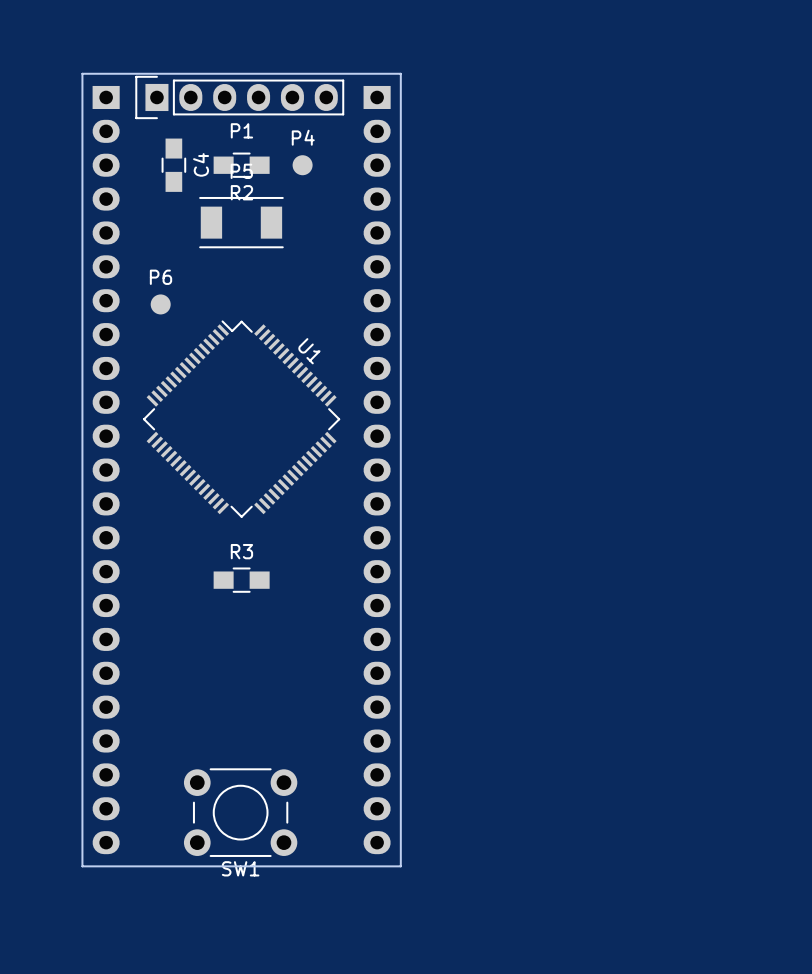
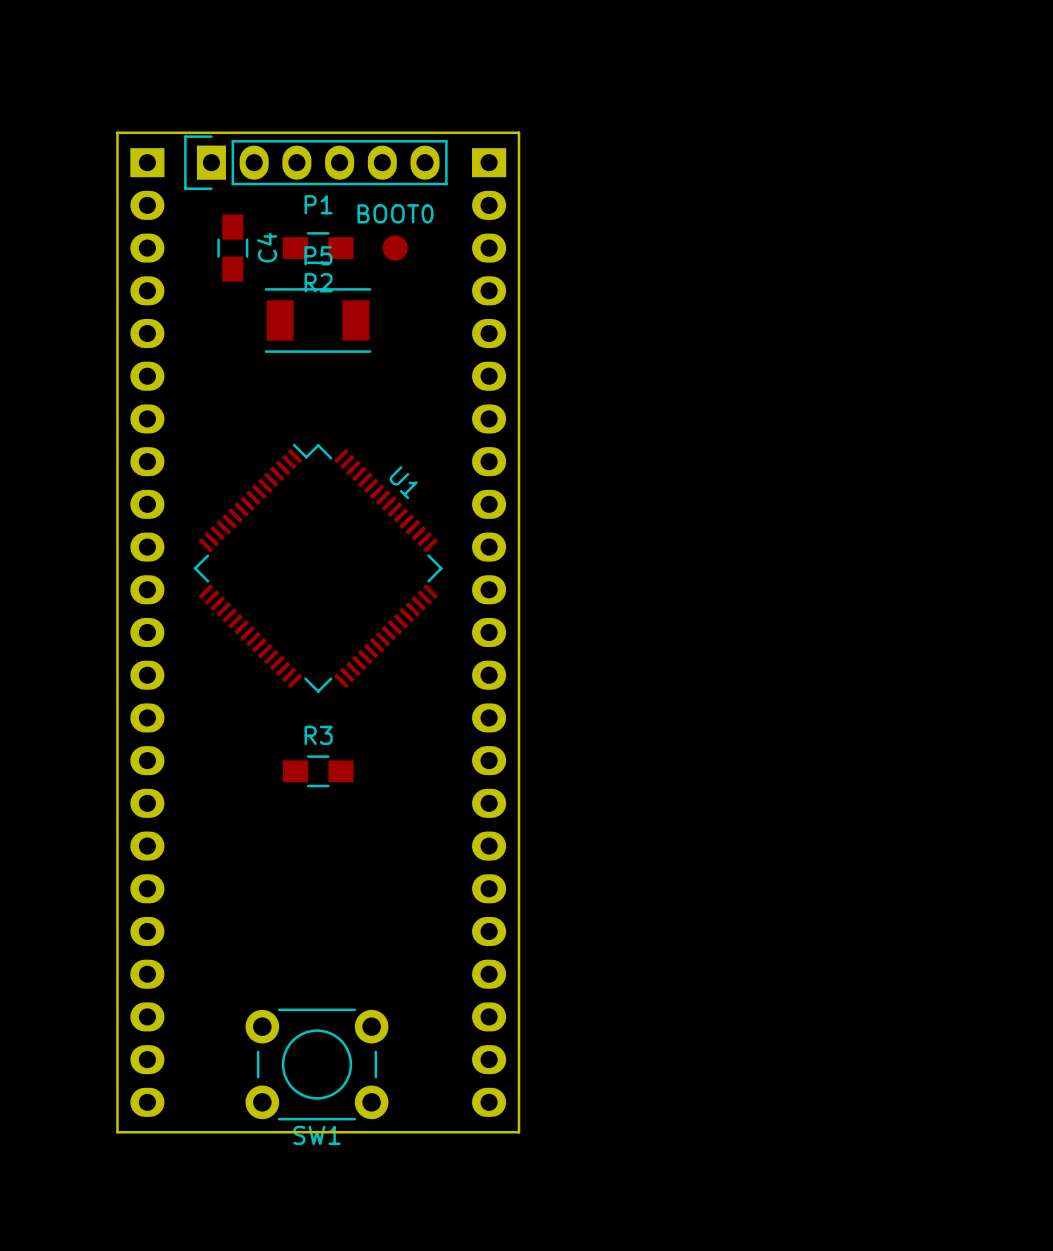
P4 name: P4 (303, 137) -> BOOT0 (395, 213)
P6: (160, 304) -> none

